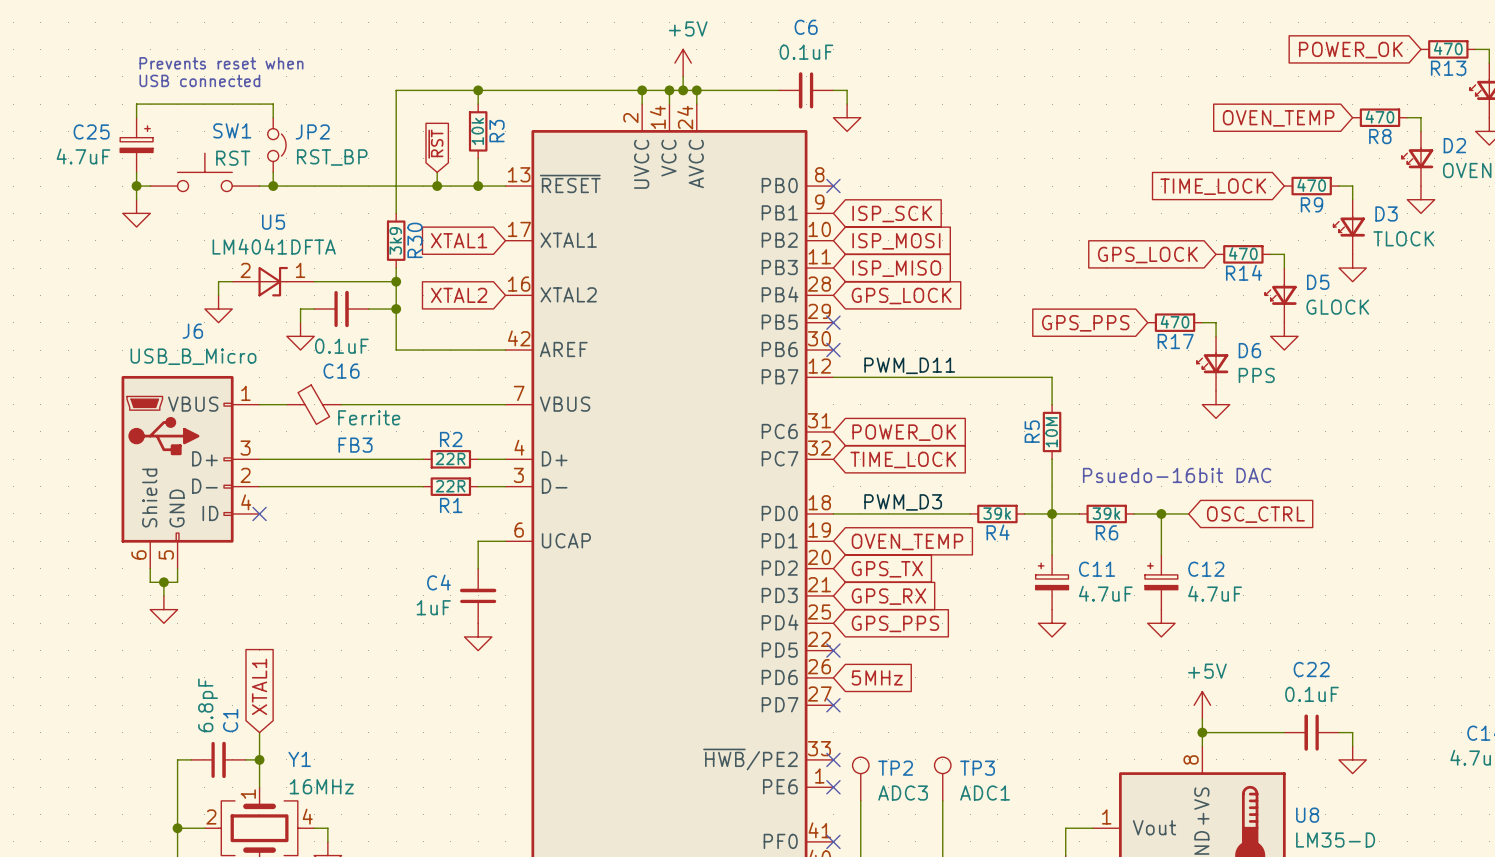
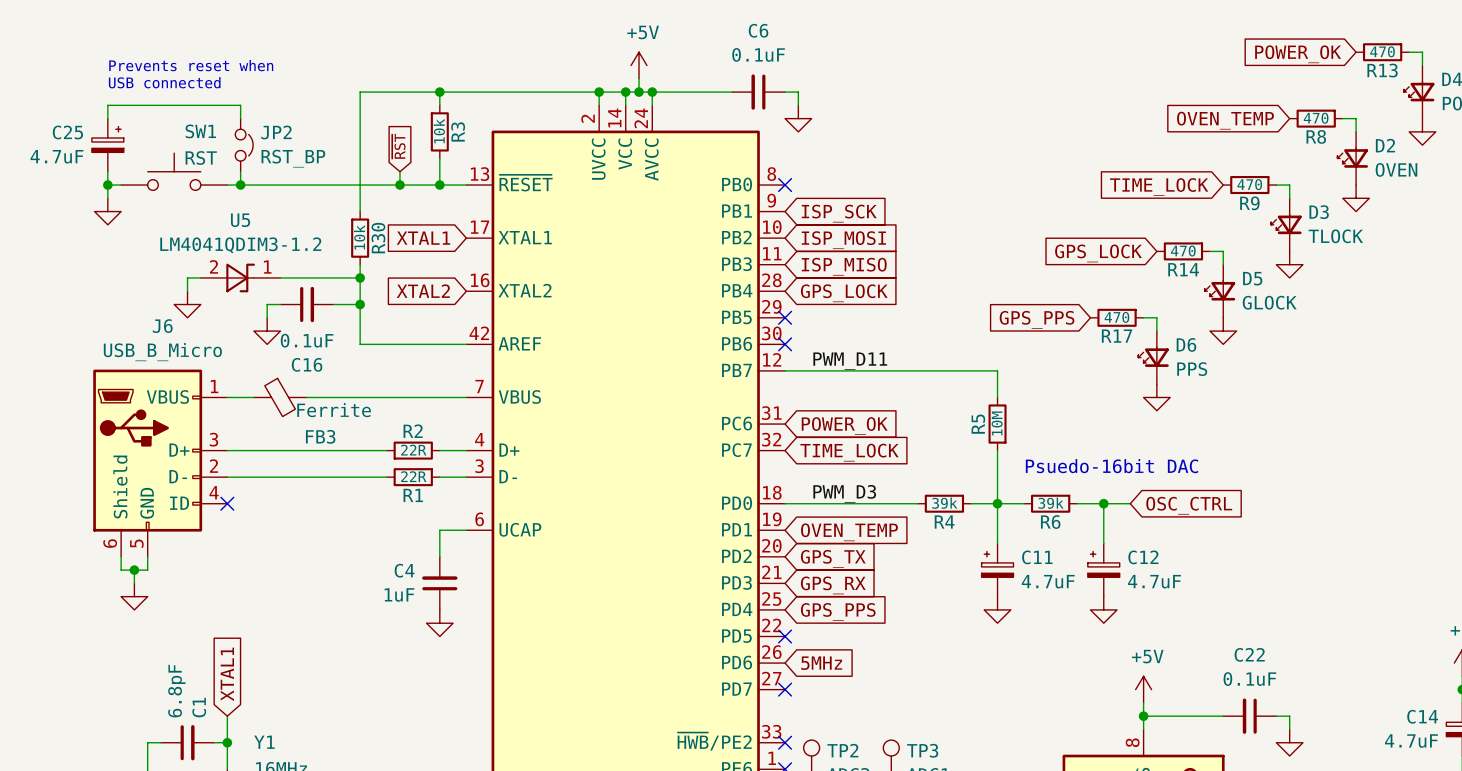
R30 value: 3k9 (395, 240) -> 10k (359, 237)
U5 value: LM4041DFTA (274, 246) -> LM4041QDIM3-1.2 (240, 245)

